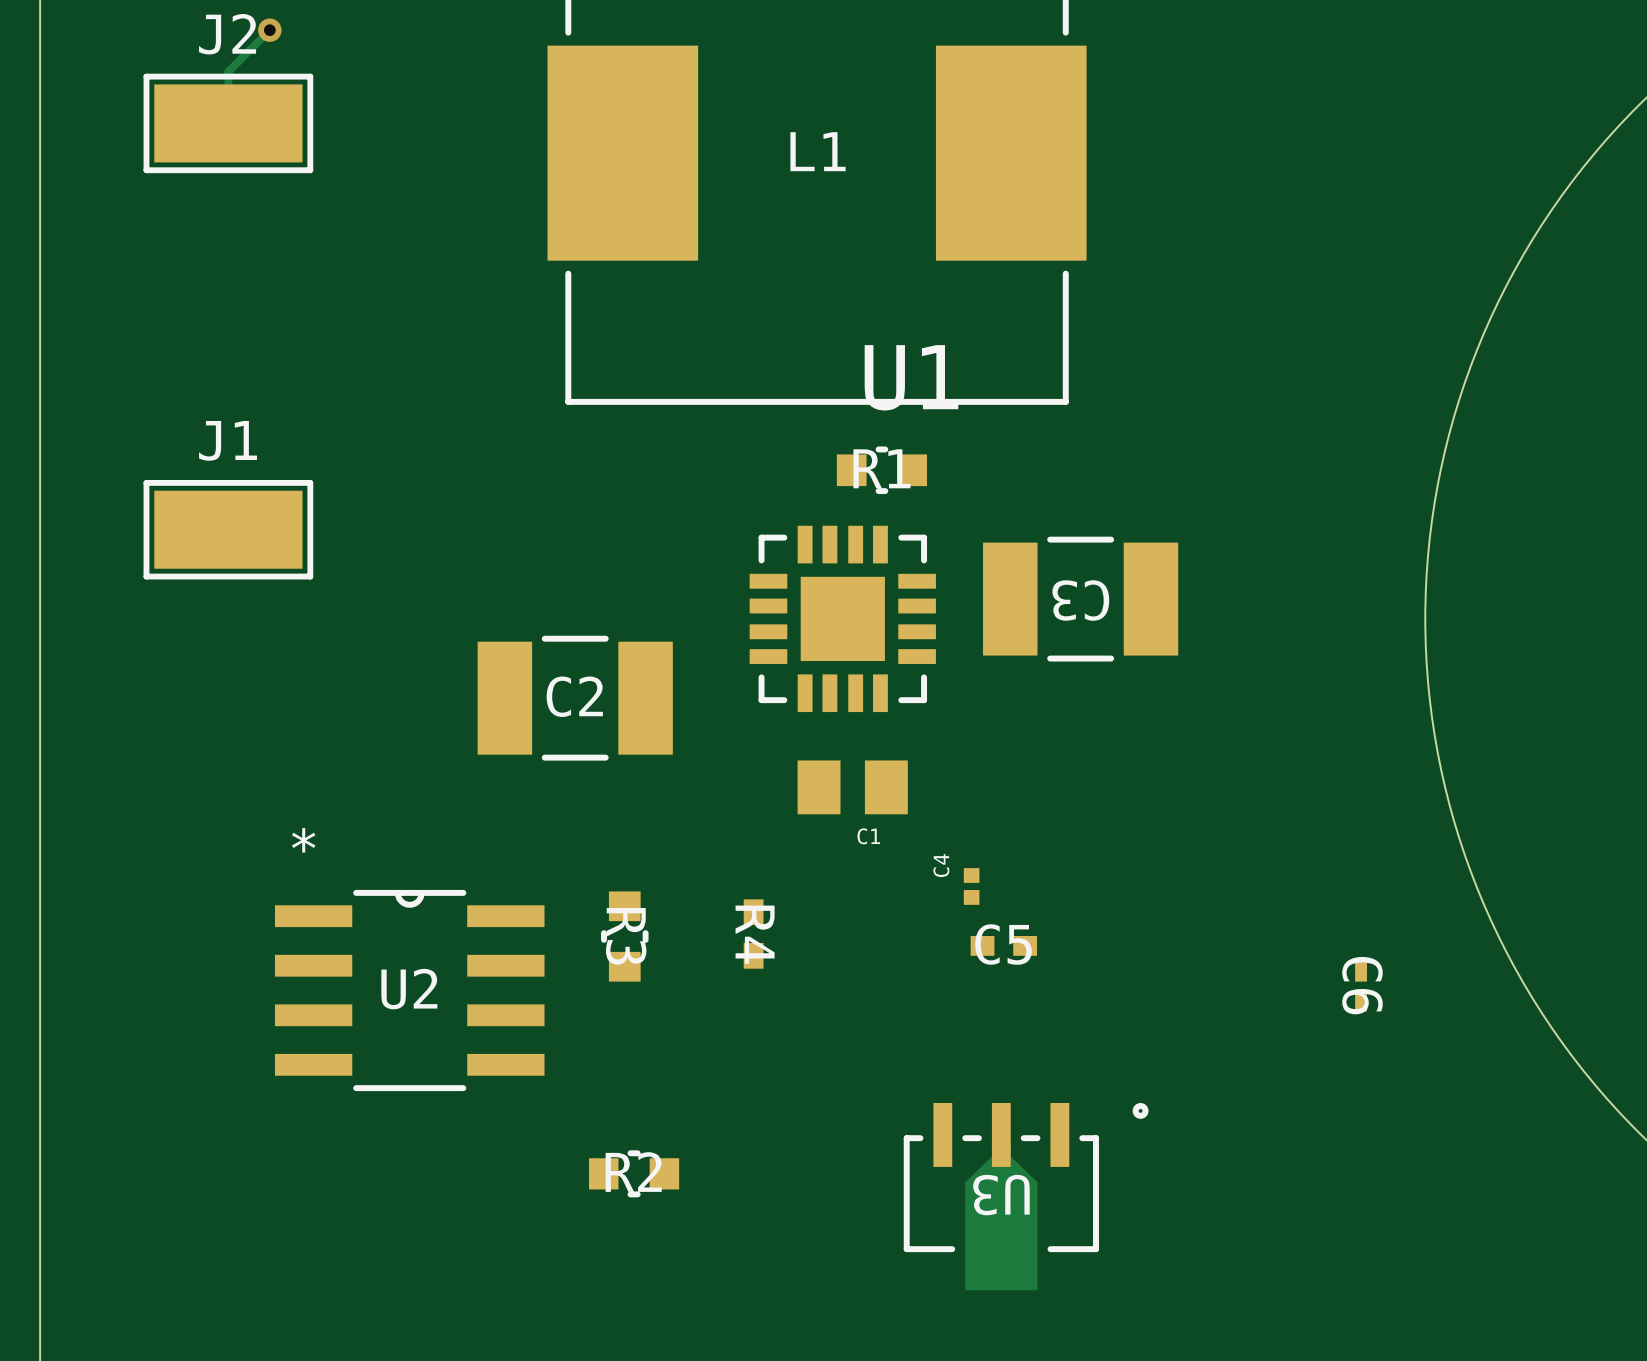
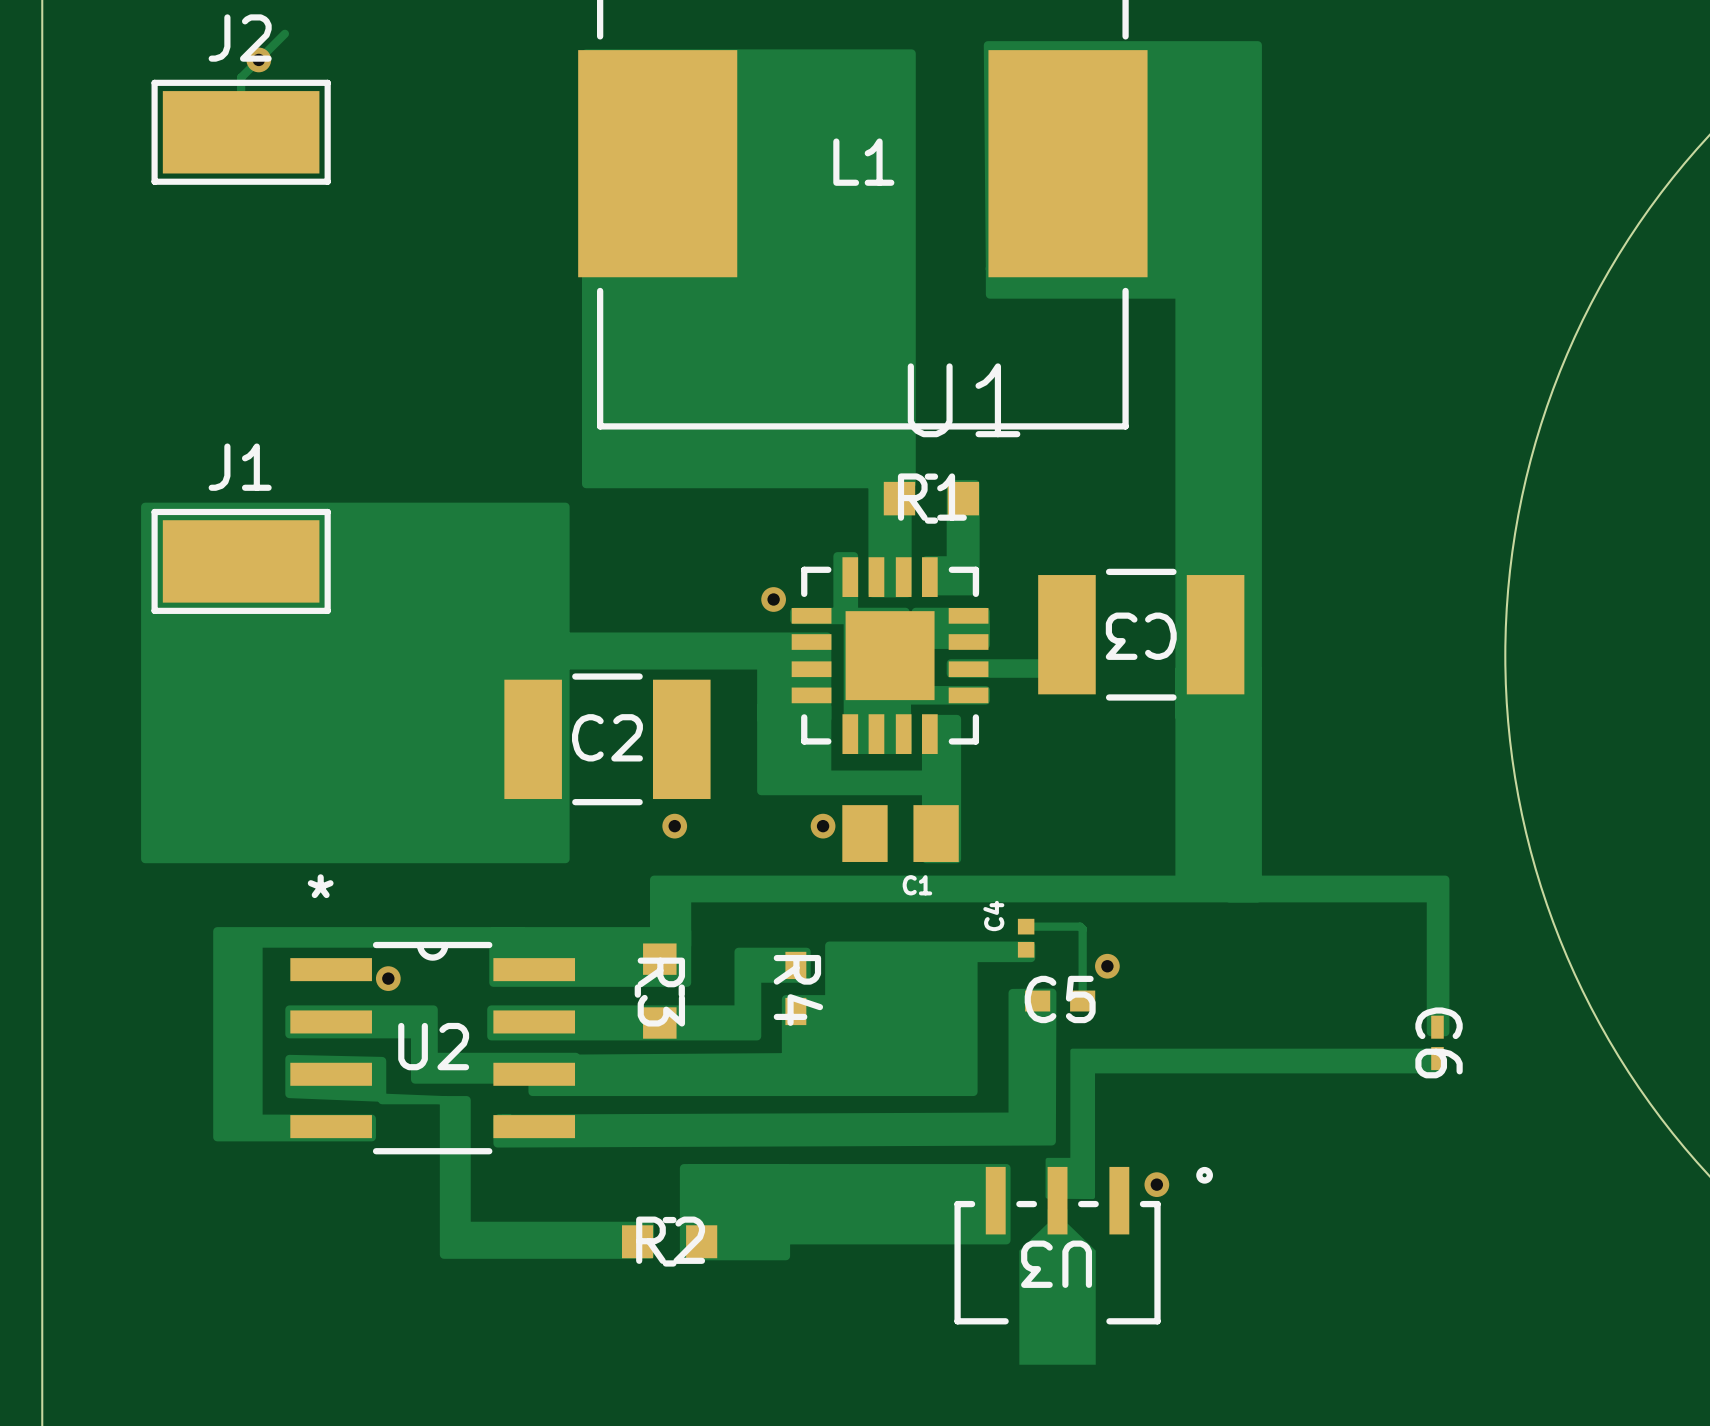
via position: (269, 30) -> (258, 59)
drawing: none -> [141, 41, 1450, 1261]
via: none -> (773, 599)
via: none -> (674, 826)
via: none -> (823, 826)
track: none -> (1026, 926) (1080, 926) (1082, 929) (1082, 1001)
via: none -> (1107, 966)
via: none -> (388, 978)
via: none -> (1156, 1184)

